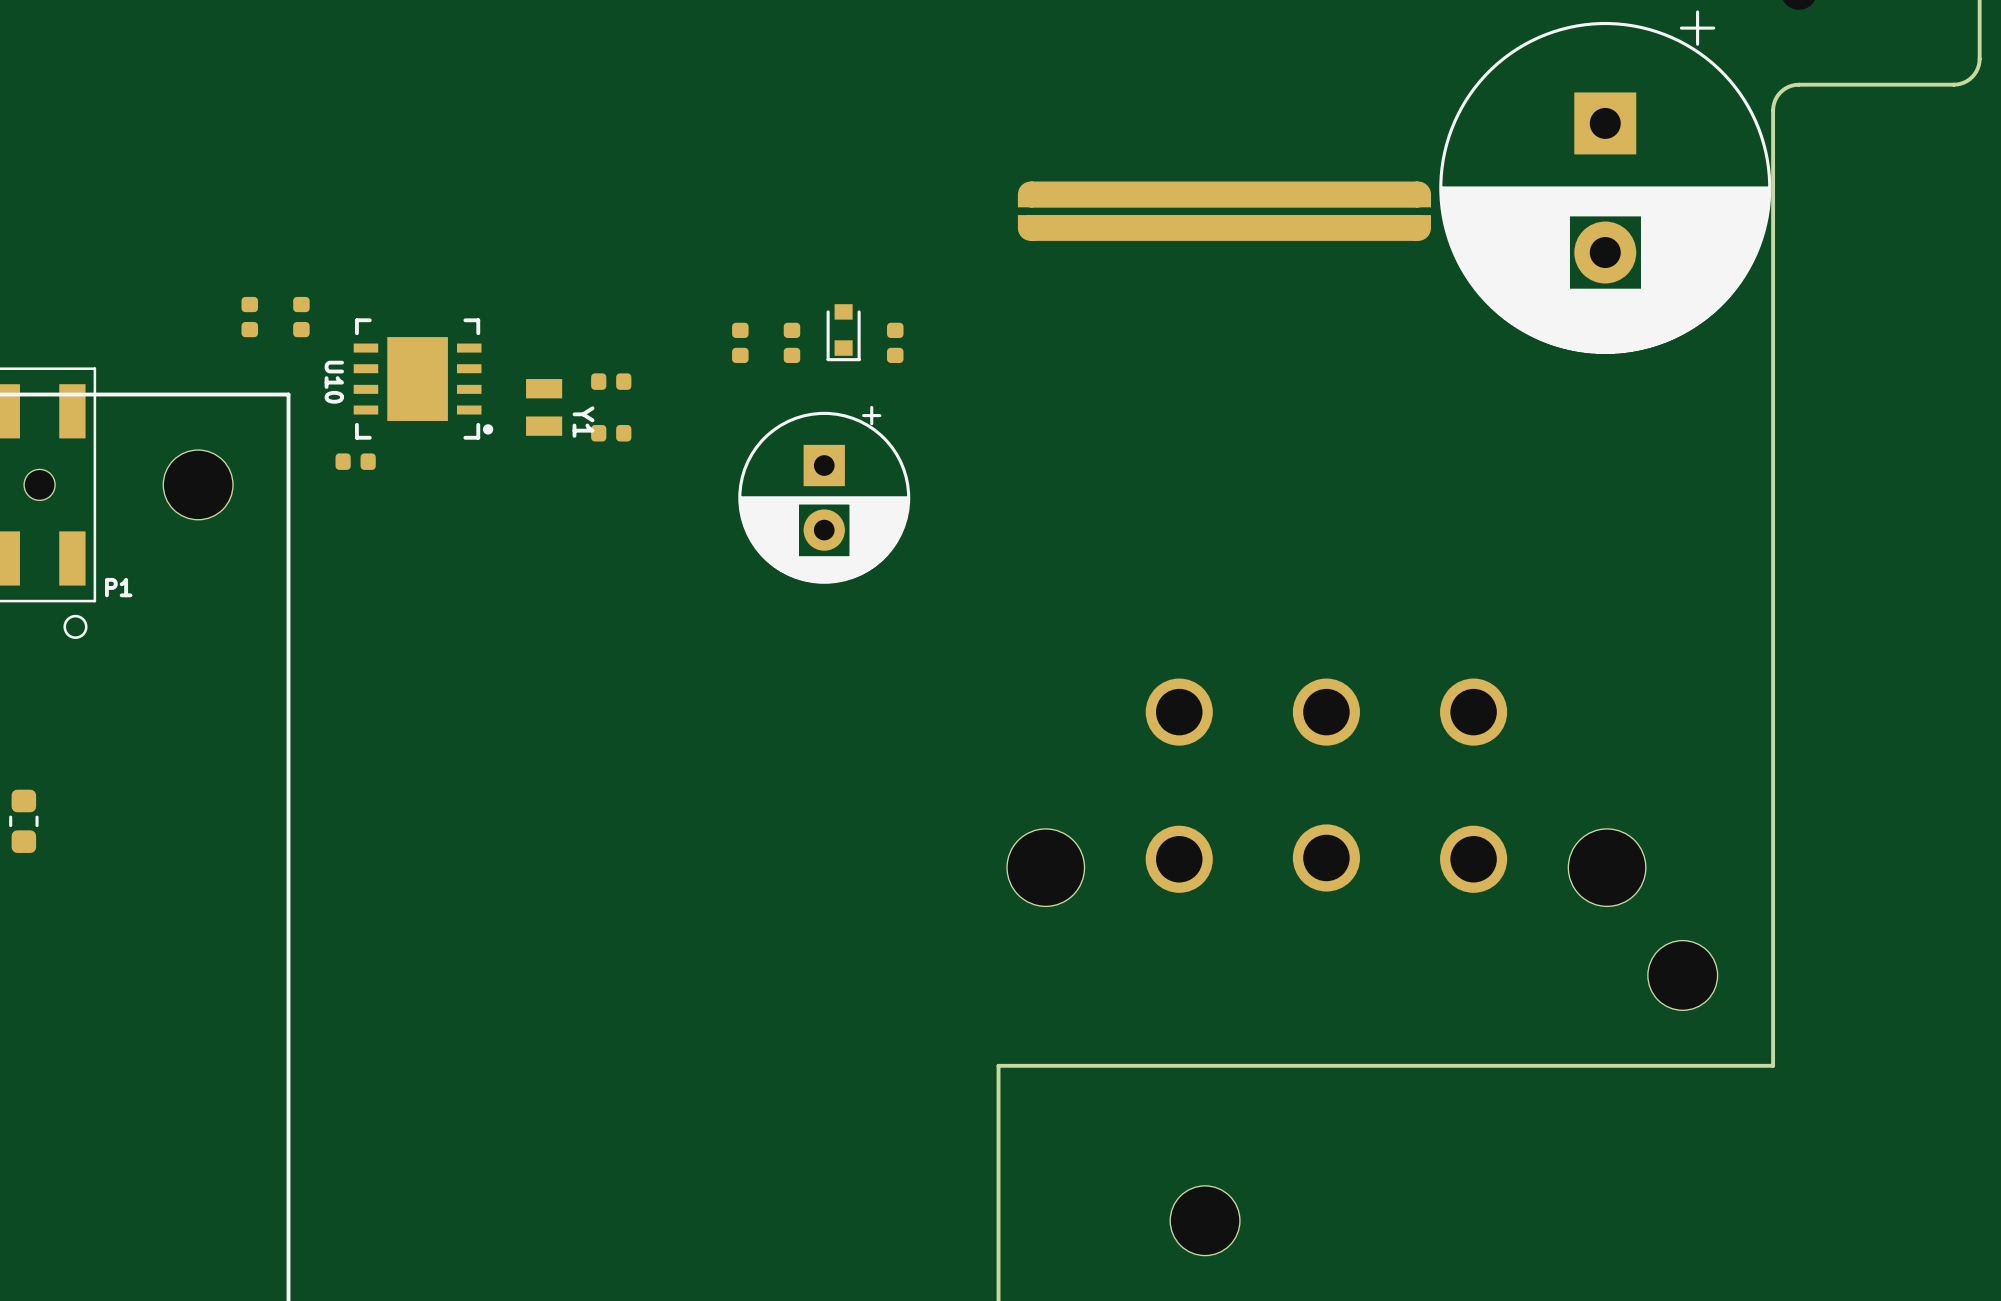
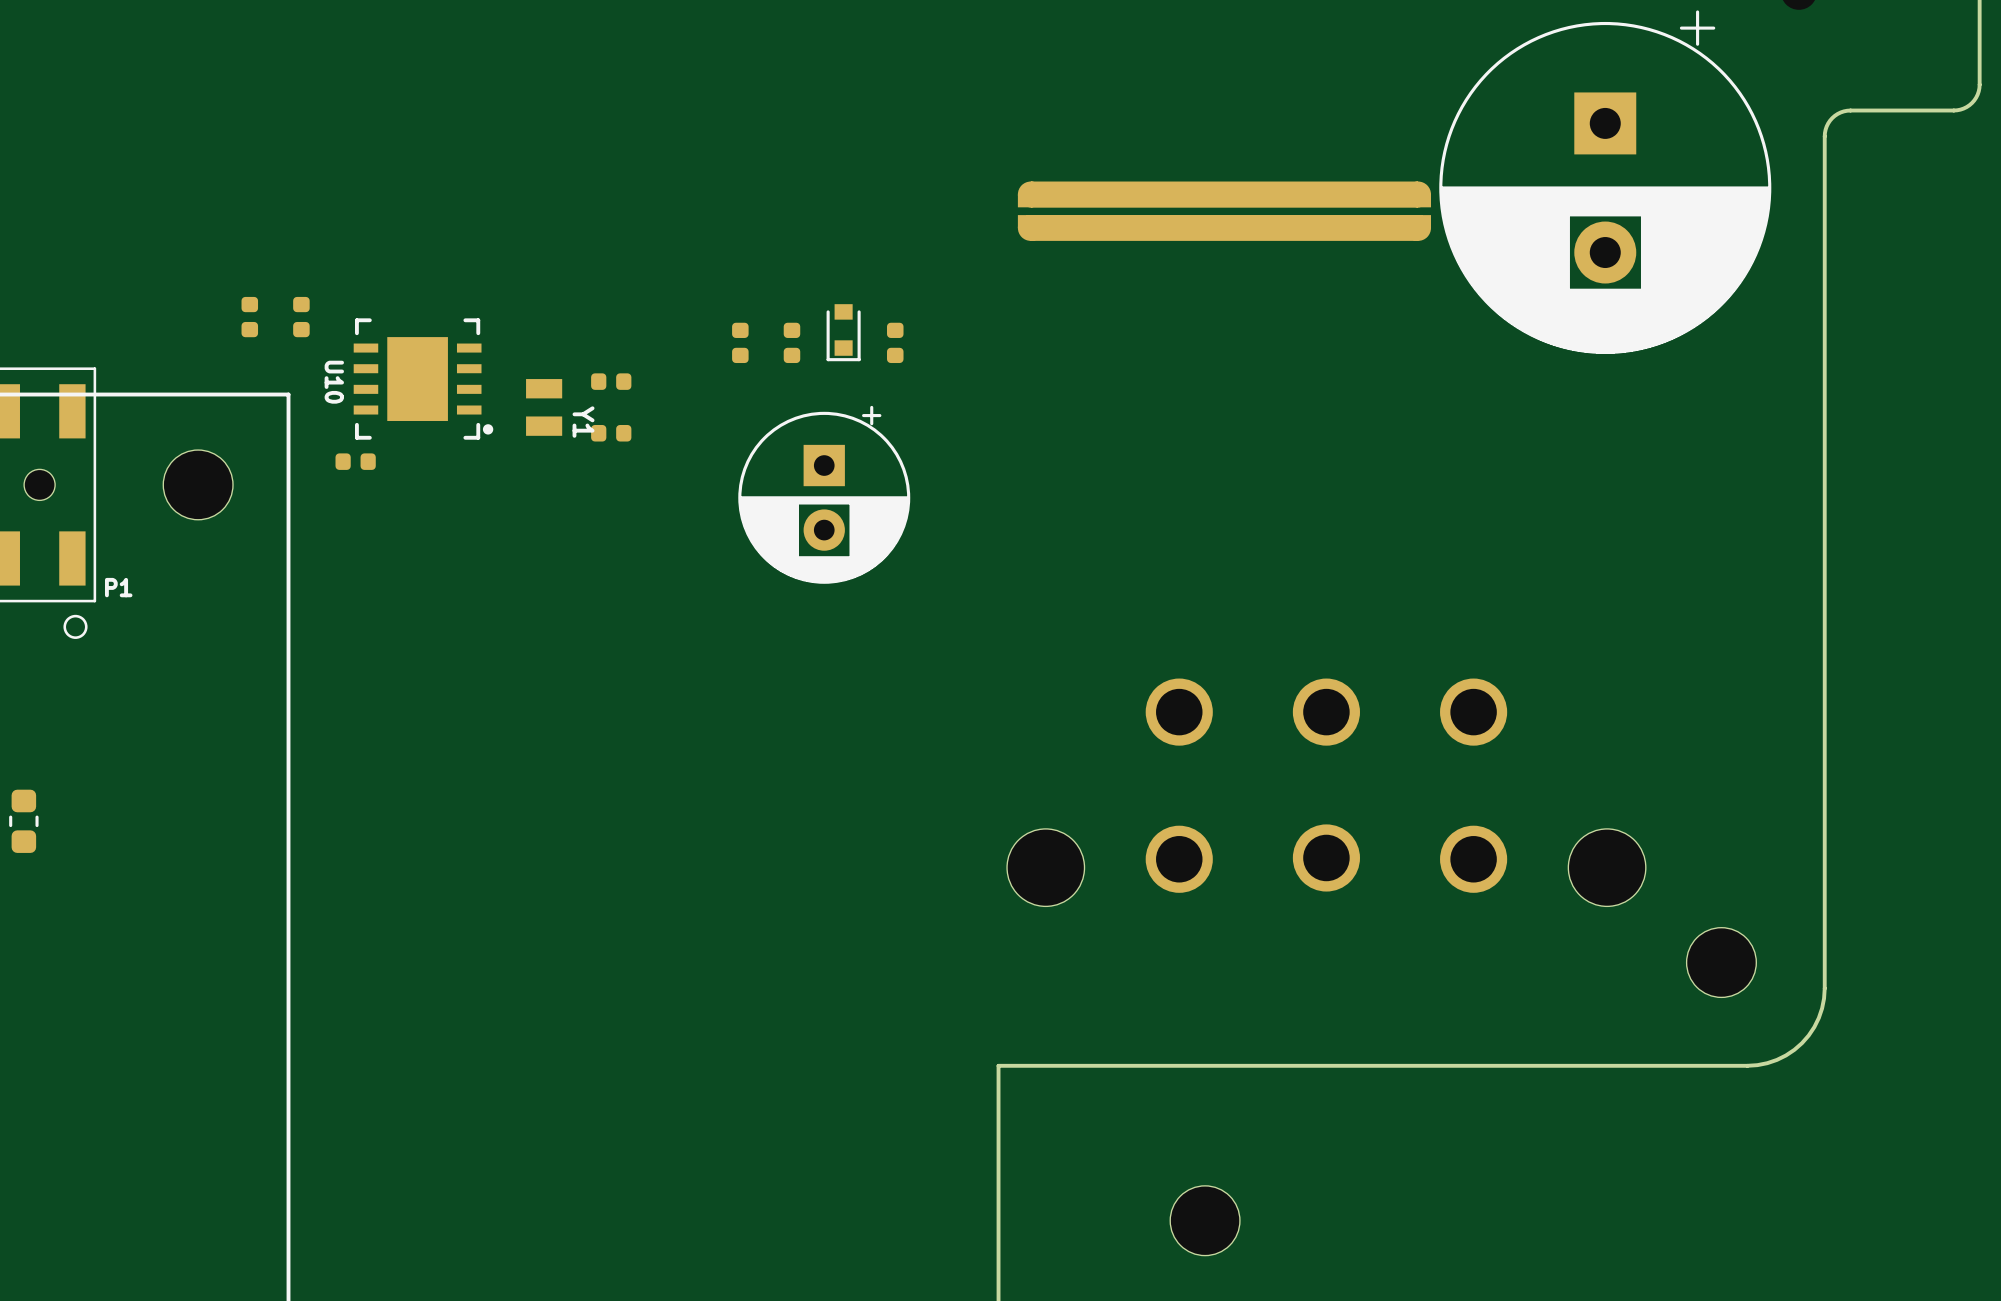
board edge: (1979, 58) (1974, 74) (1960, 83) (1795, 84) (1780, 92) (1773, 103) (1773, 1065) (1747, 1065) -> (1979, 58) (1978, 91) (1972, 102) (1963, 108) (1953, 110) (1847, 110) (1832, 118) (1825, 129) (1824, 998) (1814, 1027) (1802, 1043) (1776, 1059) (1747, 1065)
part position: (1682, 975) -> (1721, 962)

